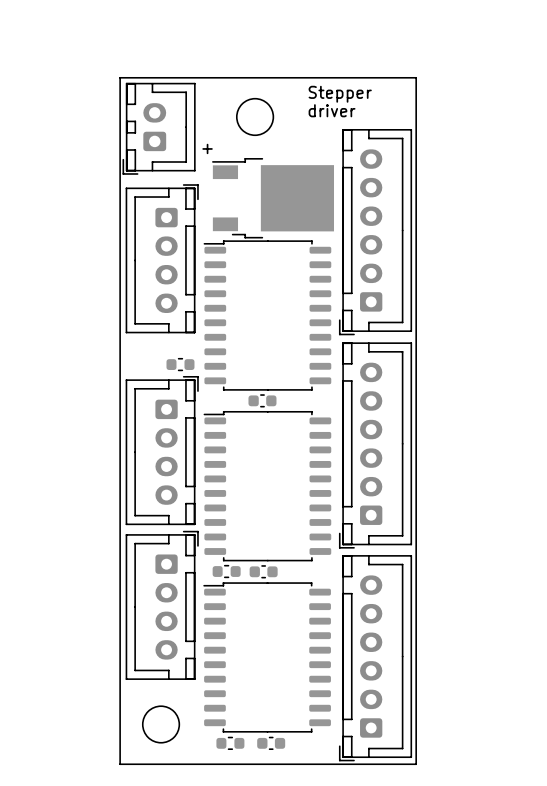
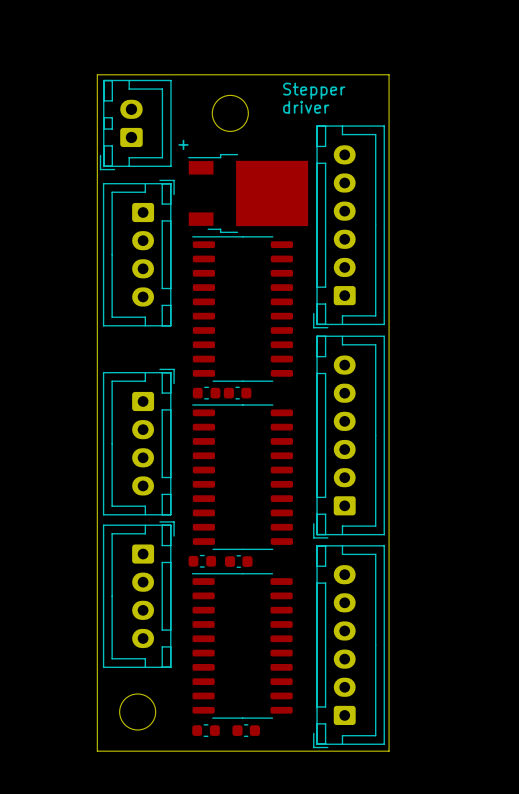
part footprint: [203, 240, 332, 391] -> [192, 236, 294, 382]
part position: (180, 364) -> (206, 393)
part footprint: [203, 411, 332, 562] -> [192, 404, 293, 551]
part footprint: [203, 582, 331, 733] -> [191, 573, 293, 719]

